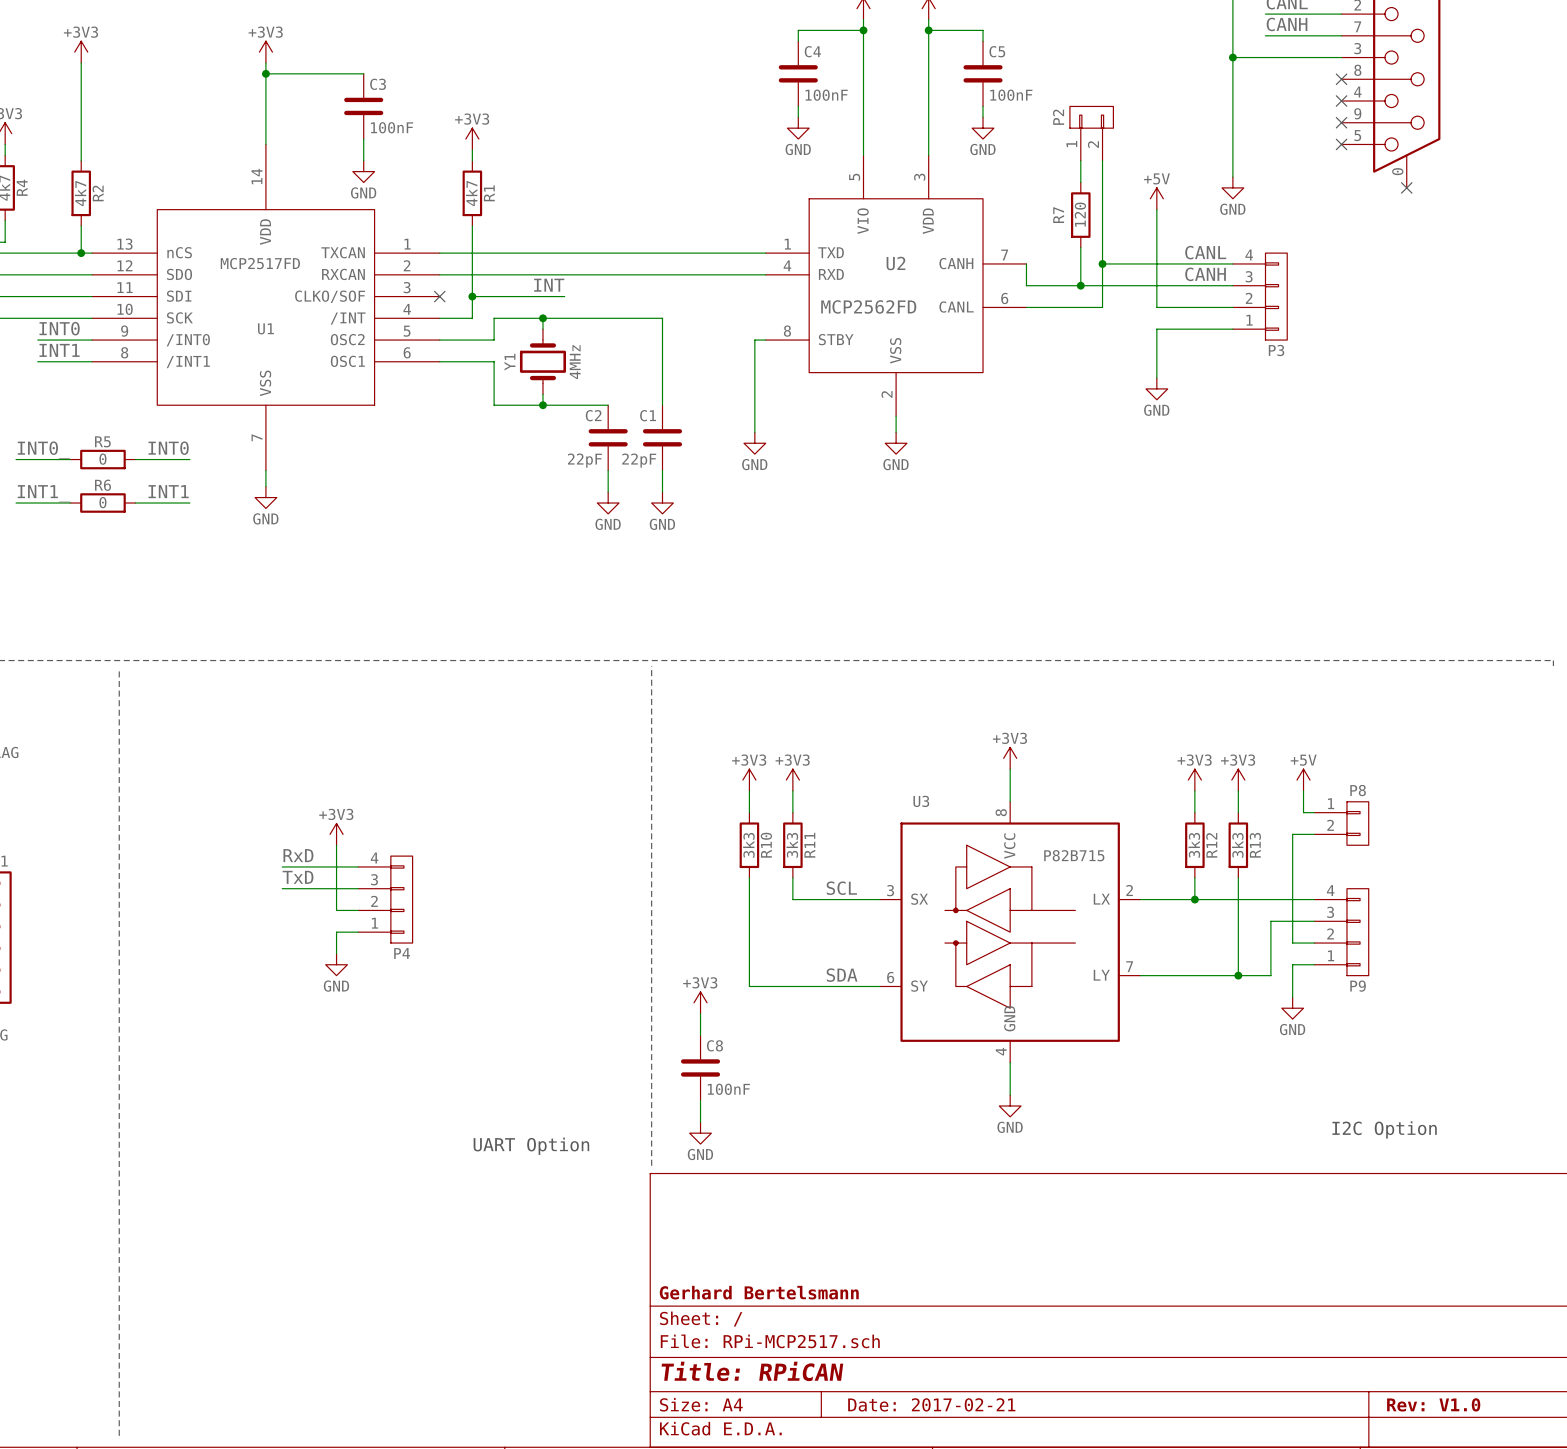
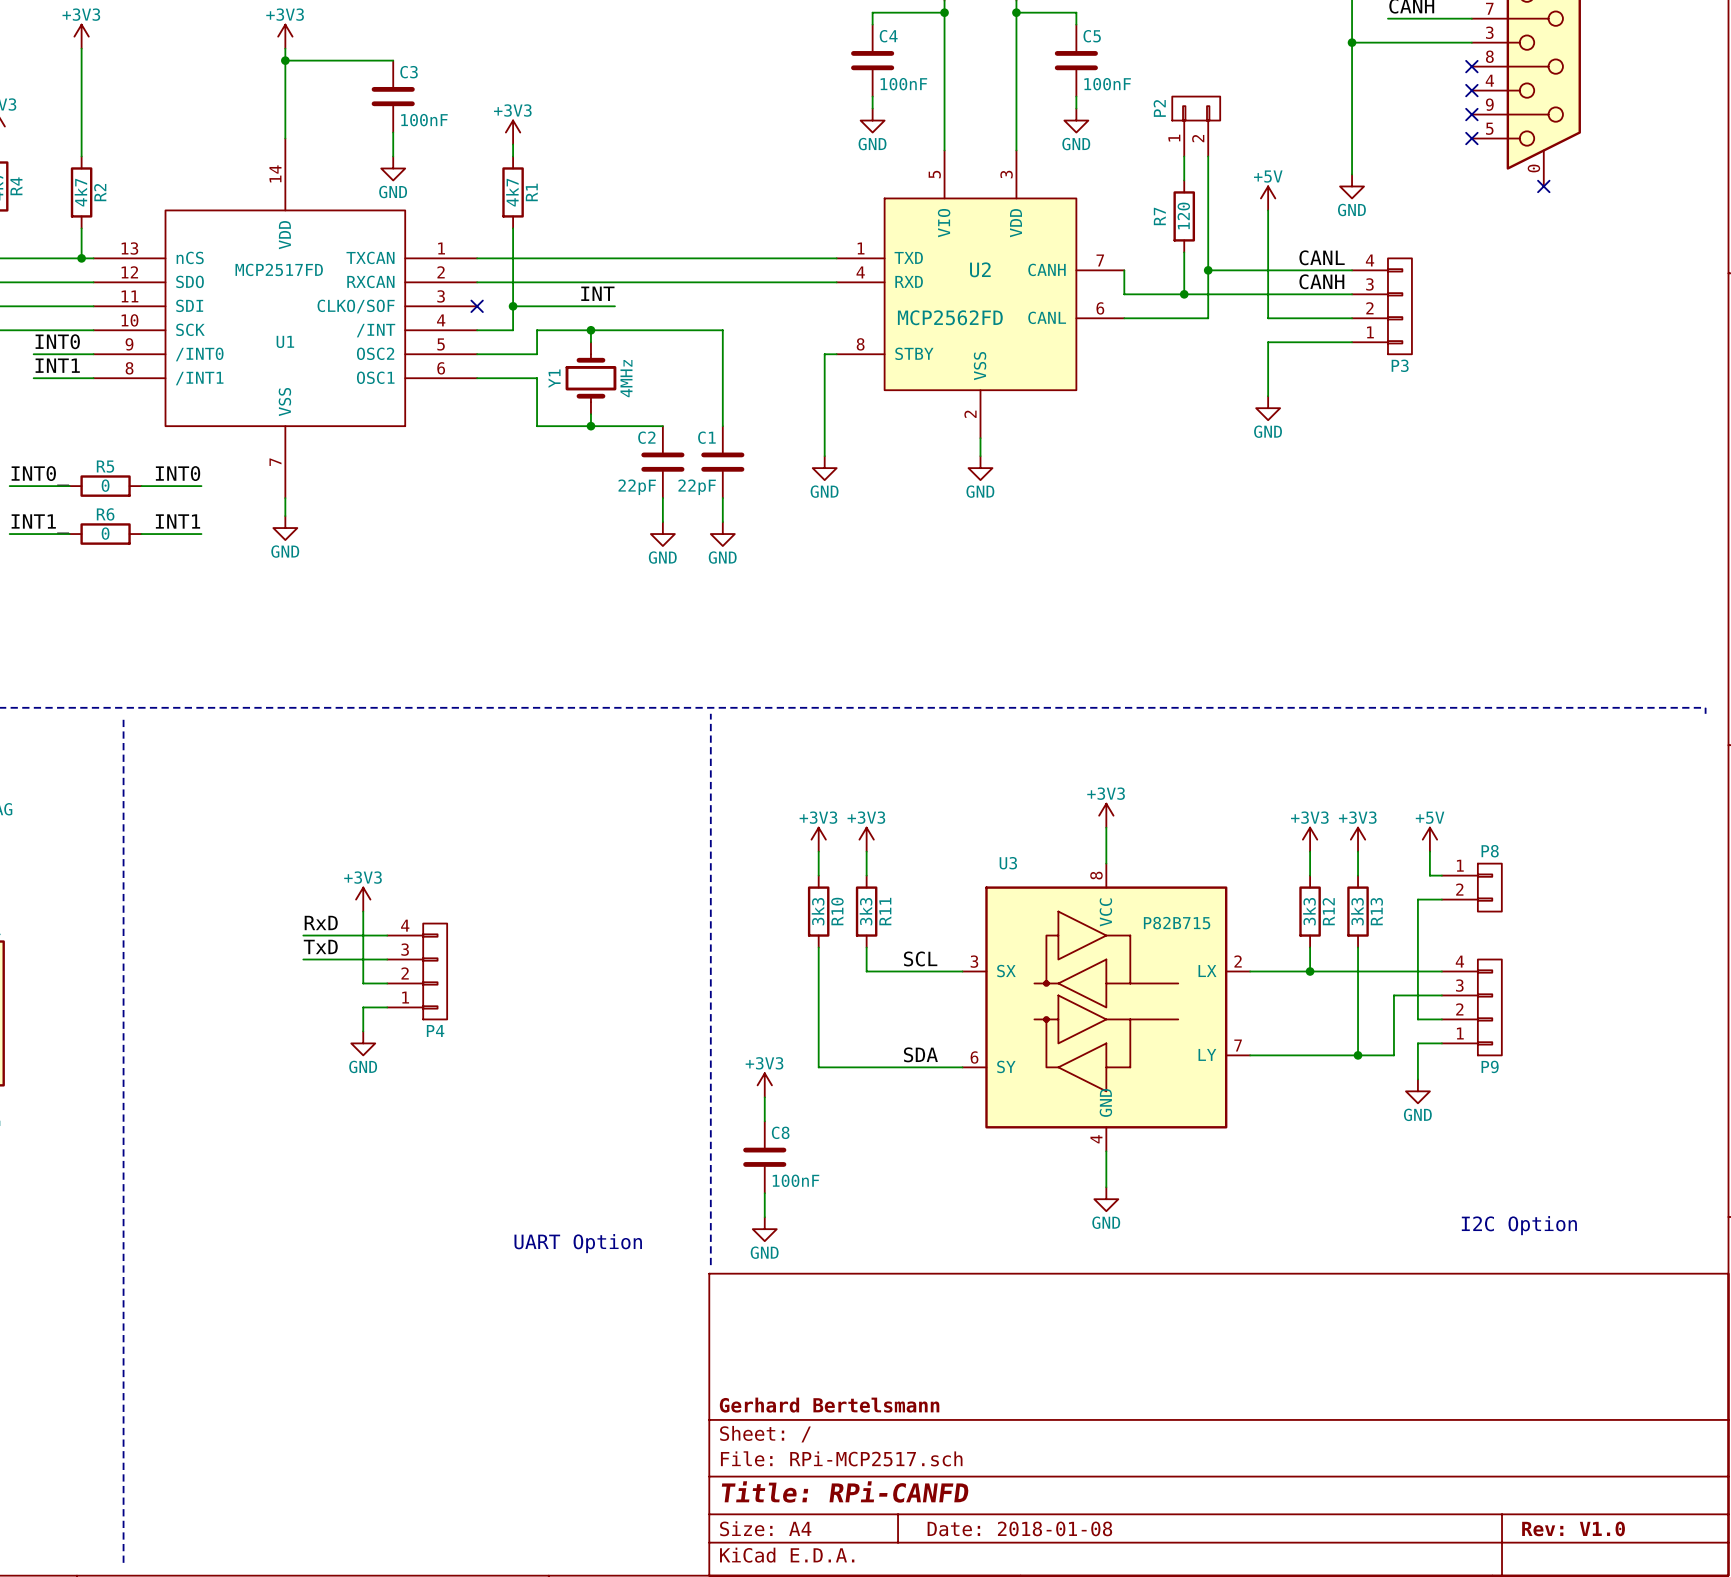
title block: Title: RPiCAN (752, 1371) -> Title: RPi-CANFD (845, 1491)
title block: Date: 2017-02-21 (931, 1404) -> Date: 2018-01-08 (1019, 1528)

